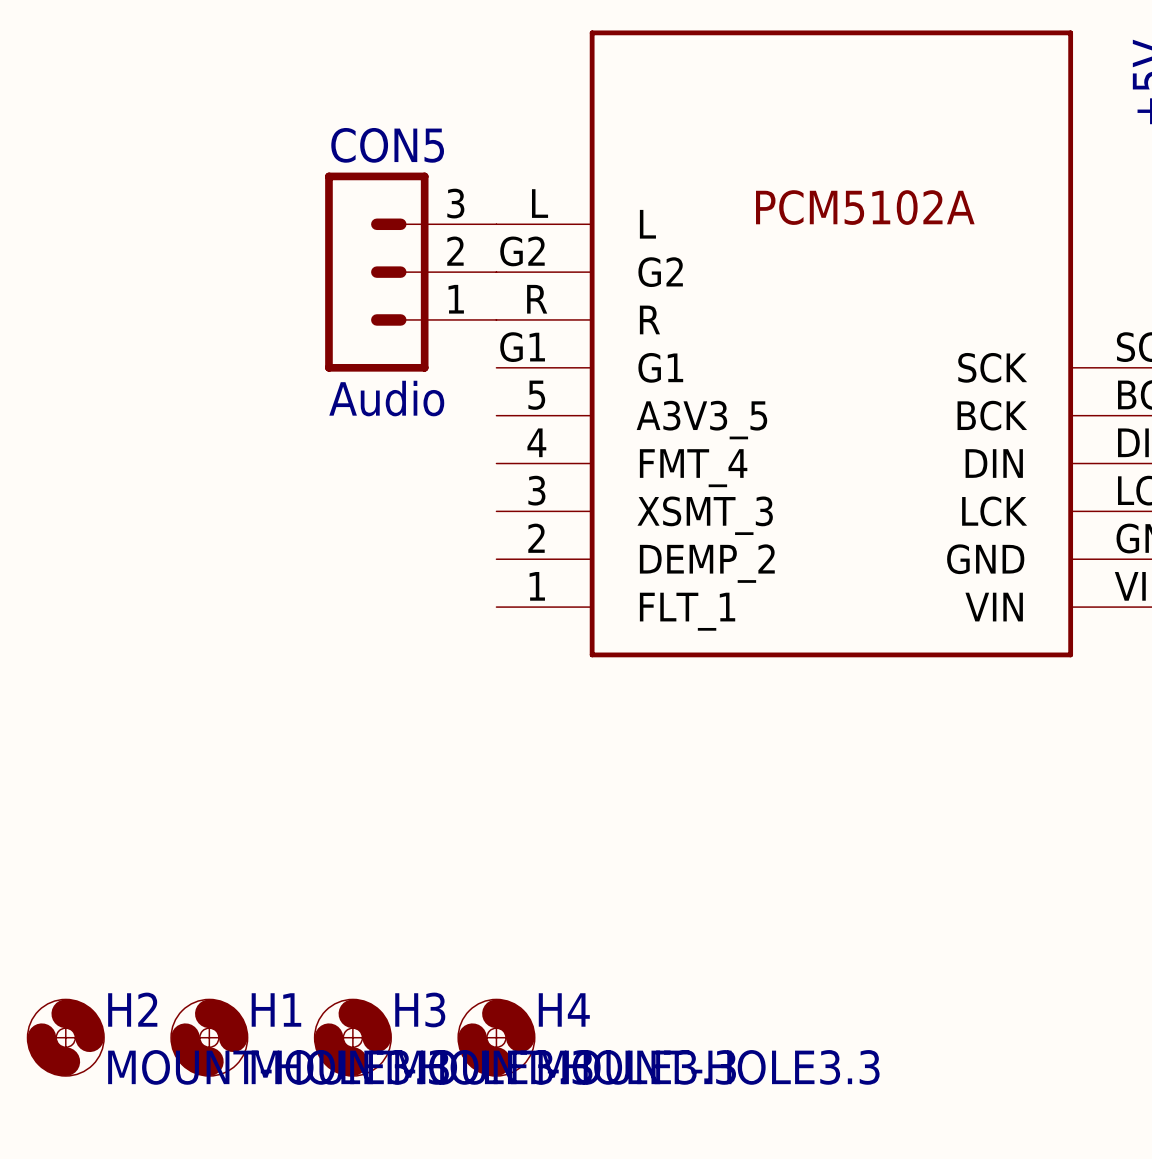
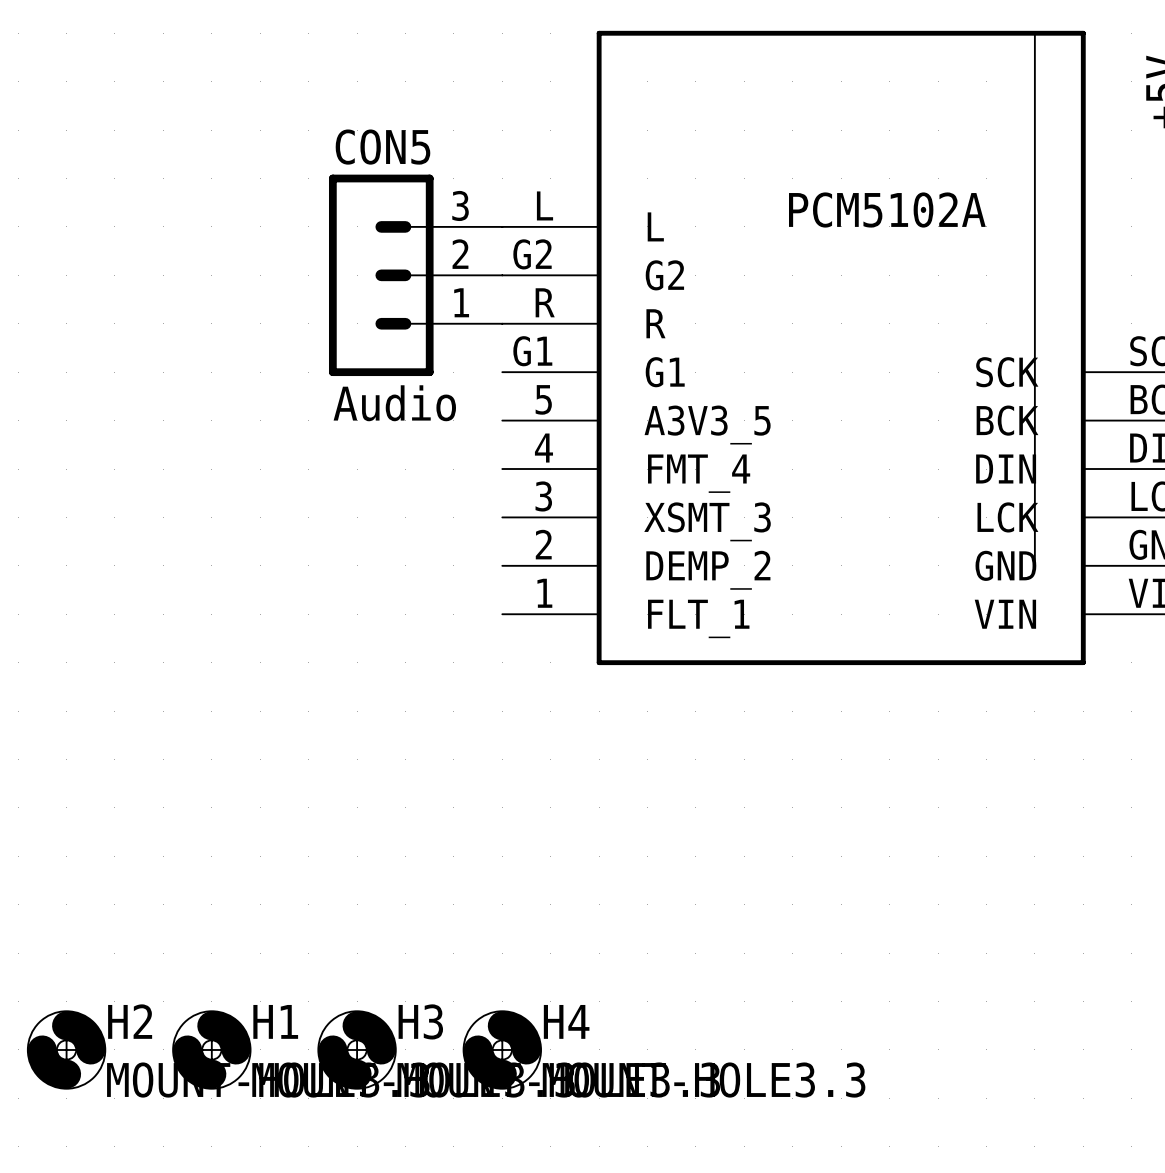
wire: none -> (938, 33) (1034, 33) (1034, 565)

